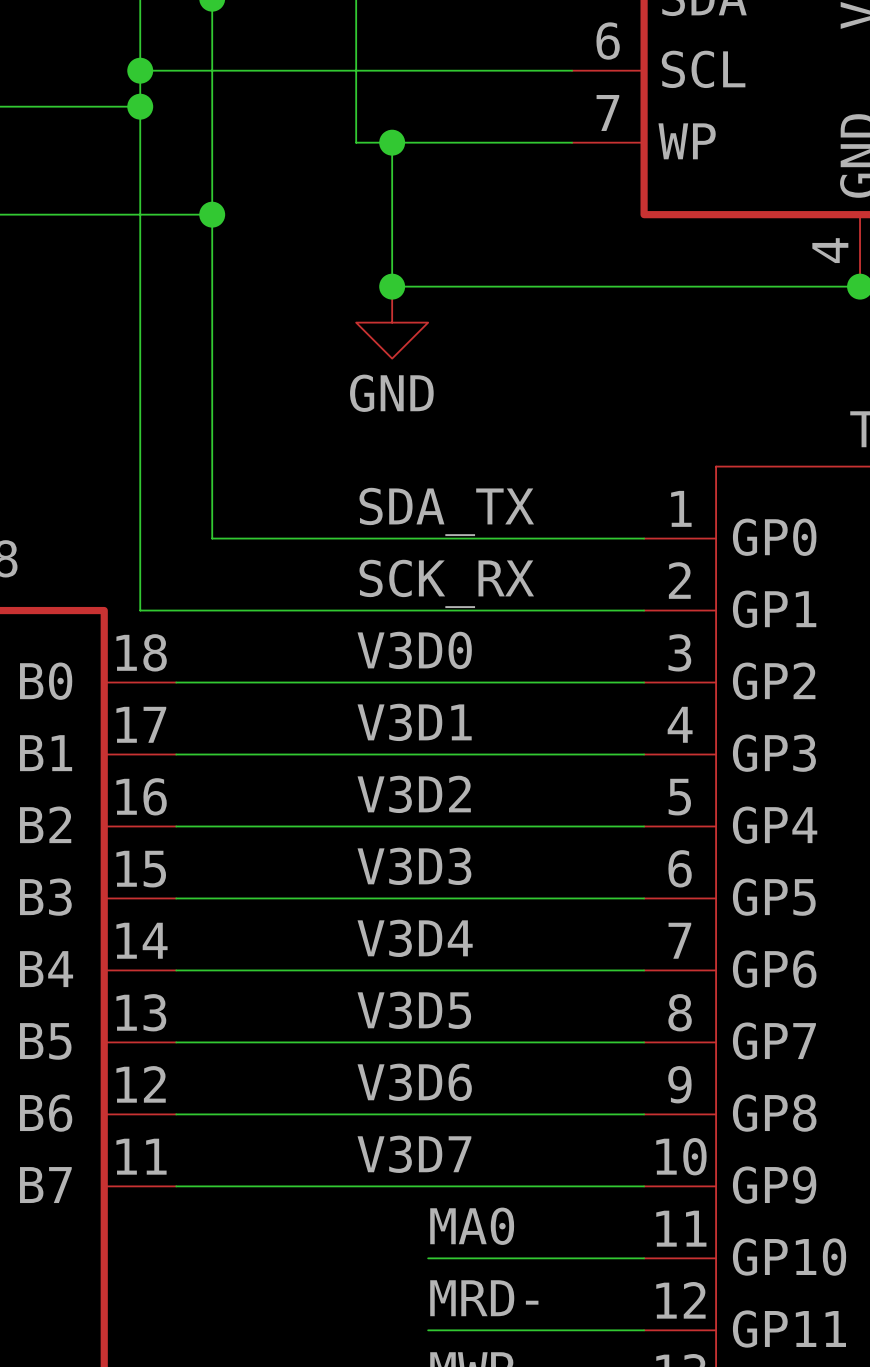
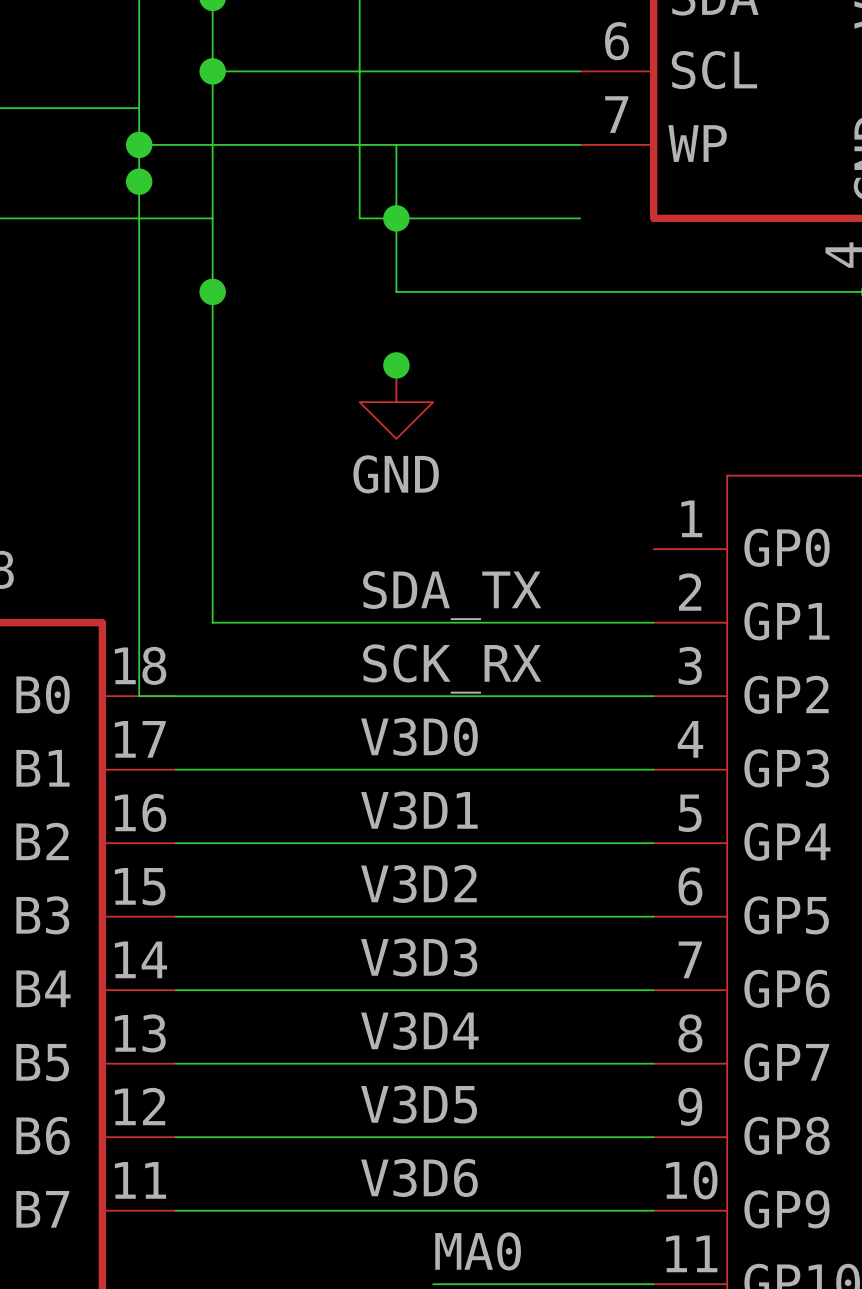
wire: (140, 70) (212, 70) -> none
junction: (140, 70) -> none
junction: none -> (212, 71)
junction: (140, 106) -> none
wire: none -> (139, 144) (359, 144) (359, 218) (580, 218)
junction: none -> (139, 144)
junction: (392, 142) -> none
junction: none -> (139, 181)
junction: (212, 214) -> none
junction: none -> (396, 218)
junction: none -> (212, 291)
junction: (392, 286) -> none
power symbol position: GND (392, 322) -> GND (396, 402)
junction: none -> (396, 365)
label: SDA_TX (446, 511) -> none
wire: (212, 538) (644, 538) -> (212, 549) (212, 622)
label: SCK_RX (446, 583) -> SDA_TX (452, 595)
wire: (140, 610) (212, 610) -> (139, 622) (139, 696) (175, 696)
label: V3D0 (414, 650) -> SCK_RX (452, 668)
label: V3D1 (414, 722) -> V3D0 (419, 736)
label: V3D2 (414, 794) -> V3D1 (419, 810)
label: V3D3 (414, 866) -> V3D2 (418, 883)
label: V3D4 (415, 938) -> V3D3 (419, 957)
label: V3D5 (414, 1010) -> V3D4 (419, 1030)
label: V3D6 (414, 1082) -> V3D5 (419, 1104)
label: V3D7 (414, 1154) -> V3D6 (419, 1177)

